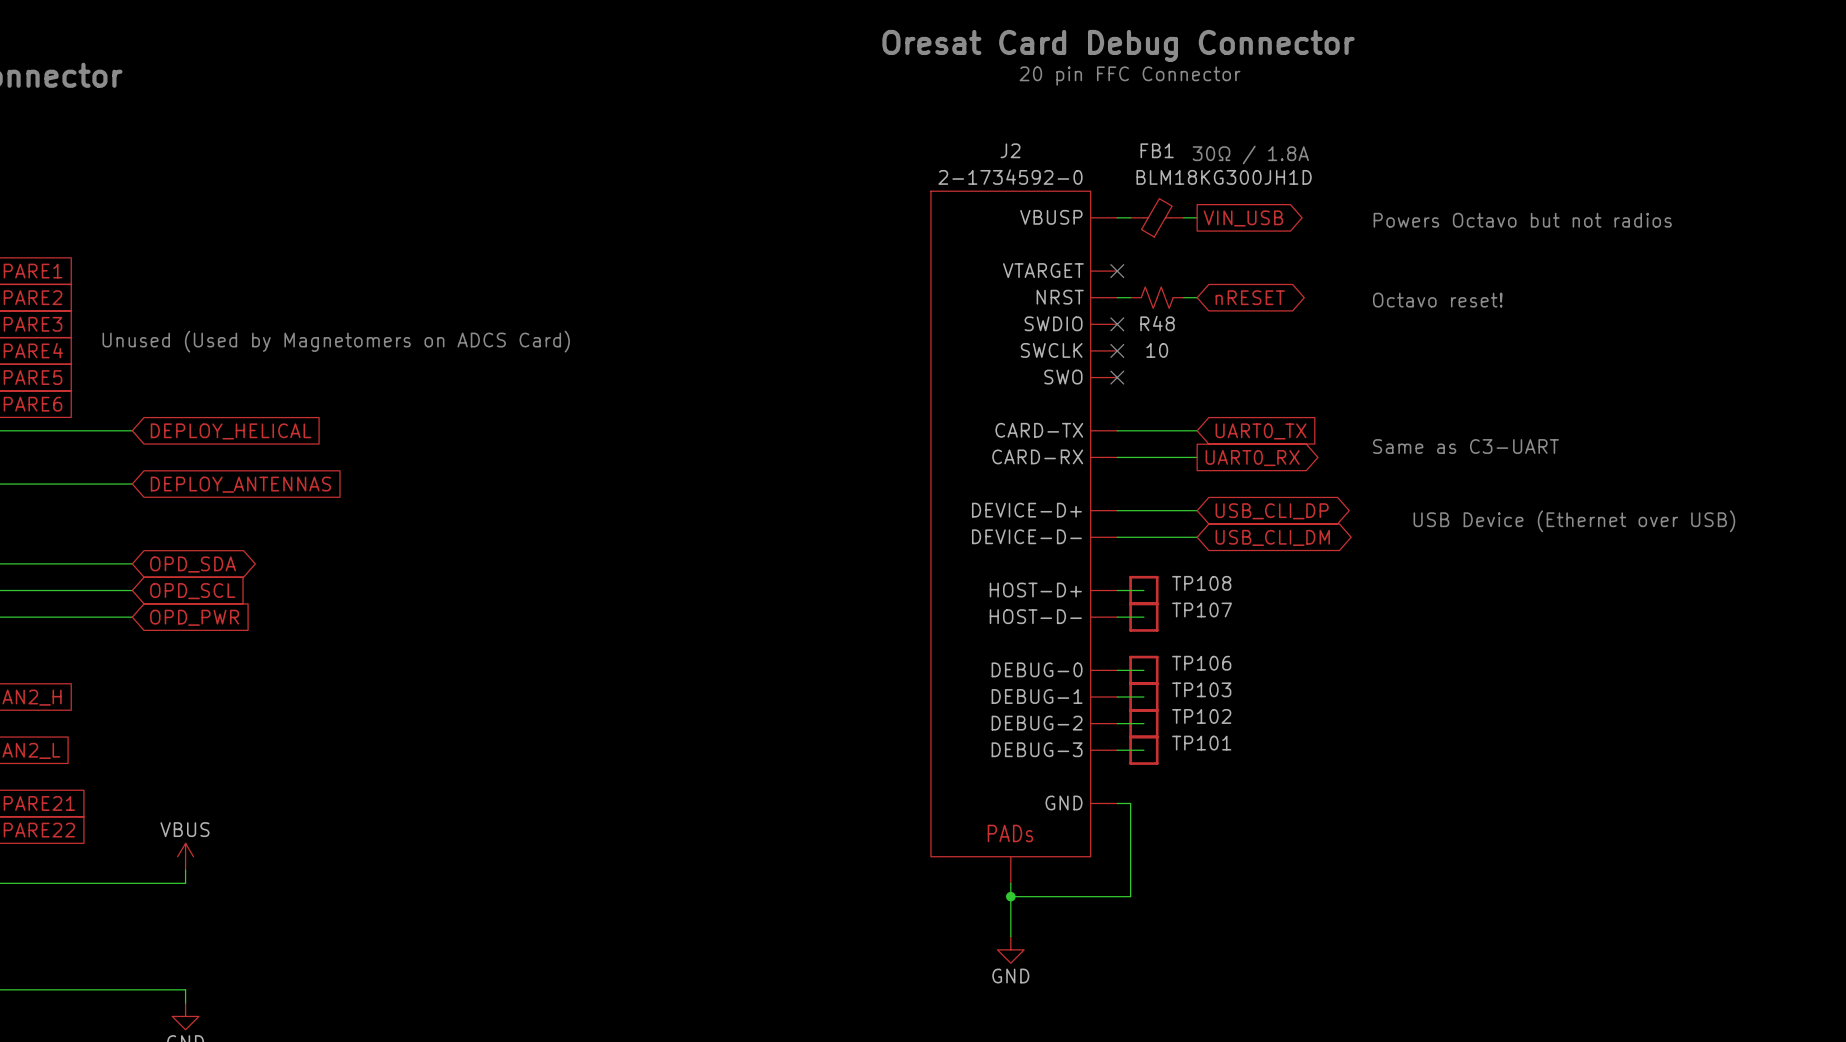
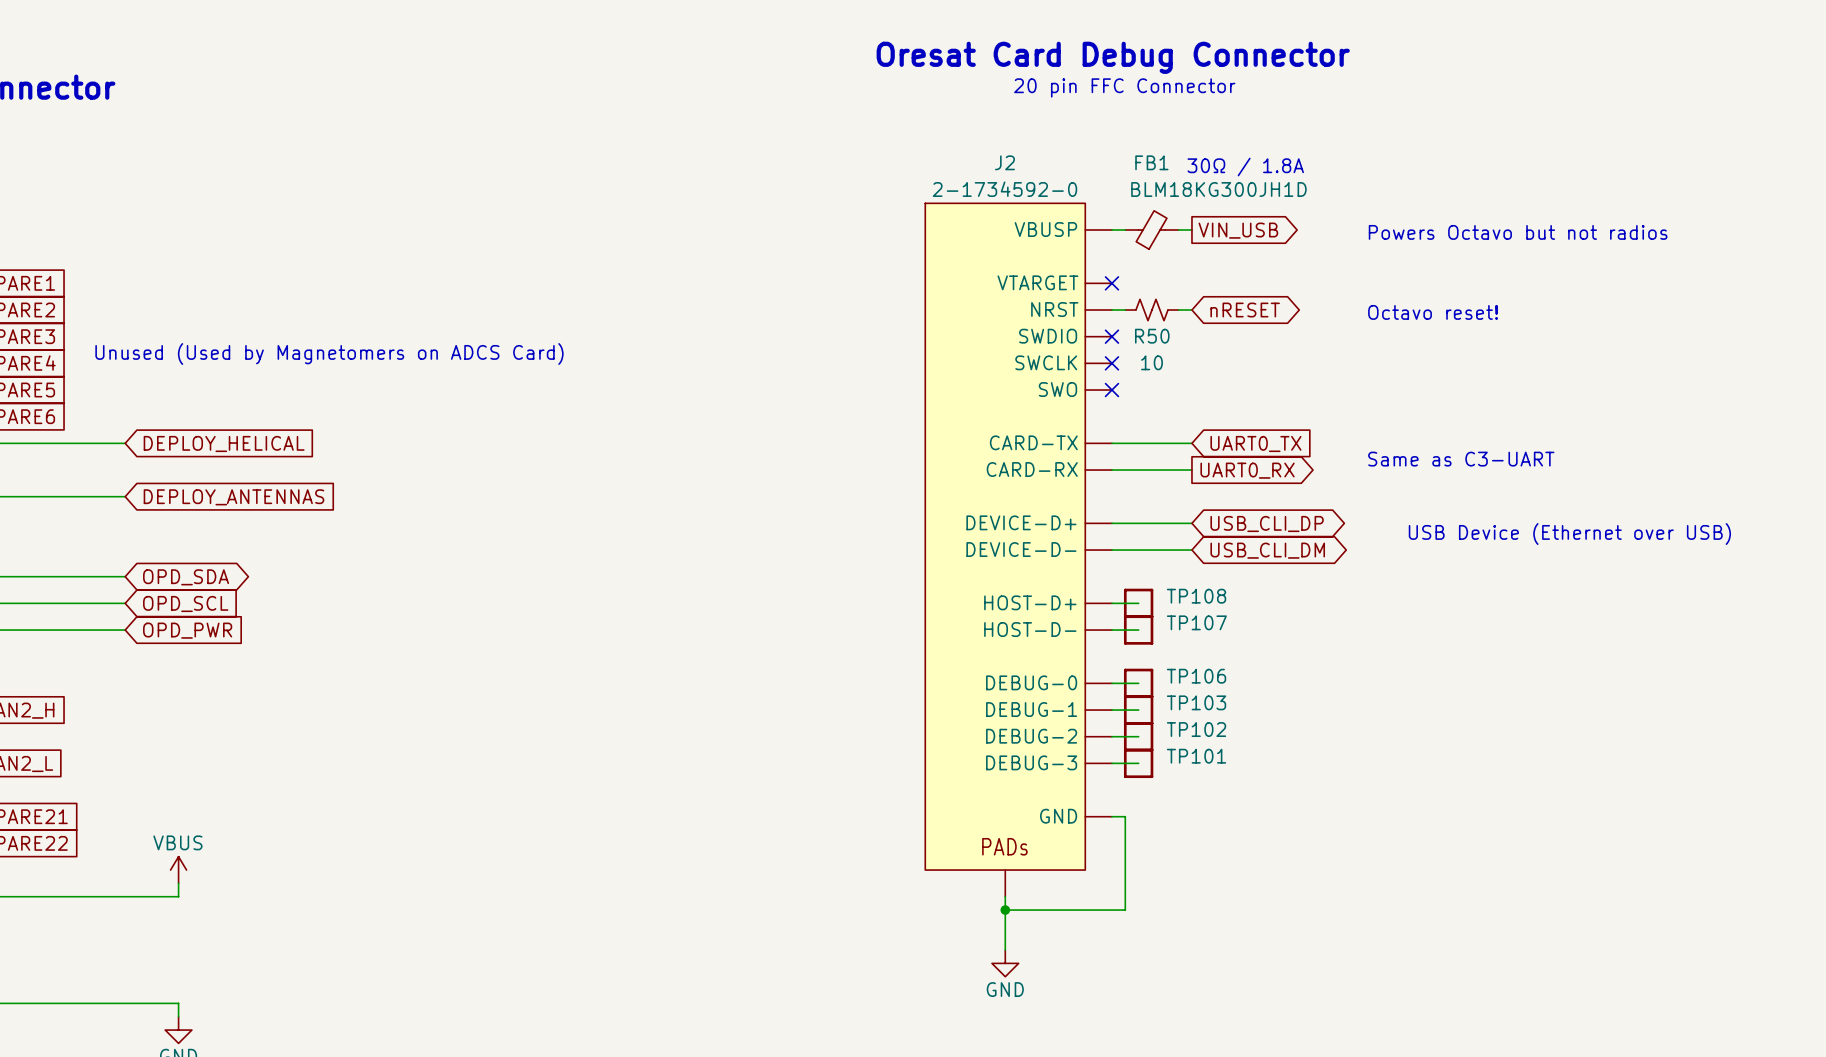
R48 name: R48 (1157, 323) -> R50 (1152, 336)

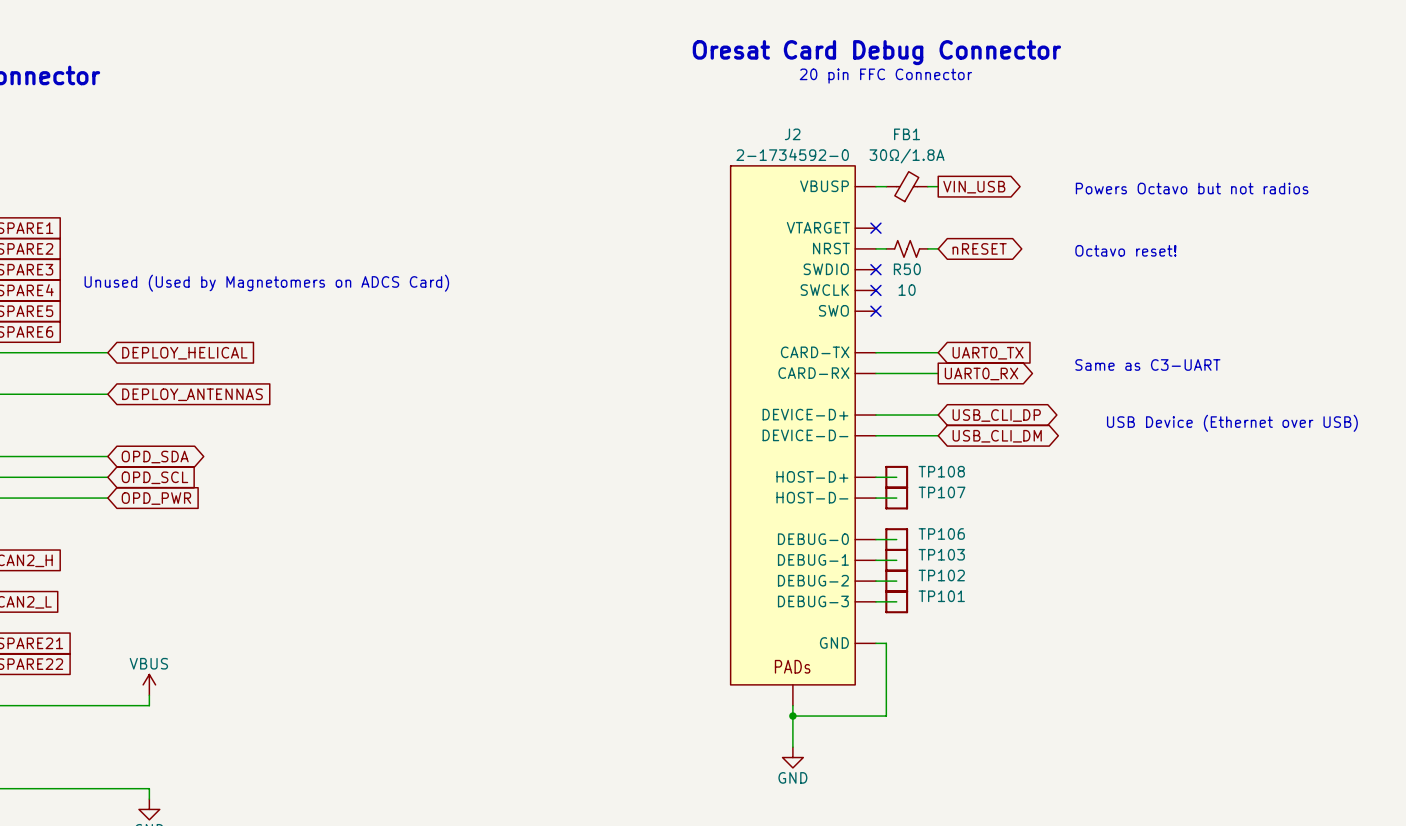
text: 30Ω / 1.8A (1245, 167) -> none
FB1 value: BLM18KG300JH1D (1218, 189) -> 30Ω/1.8A (907, 156)

